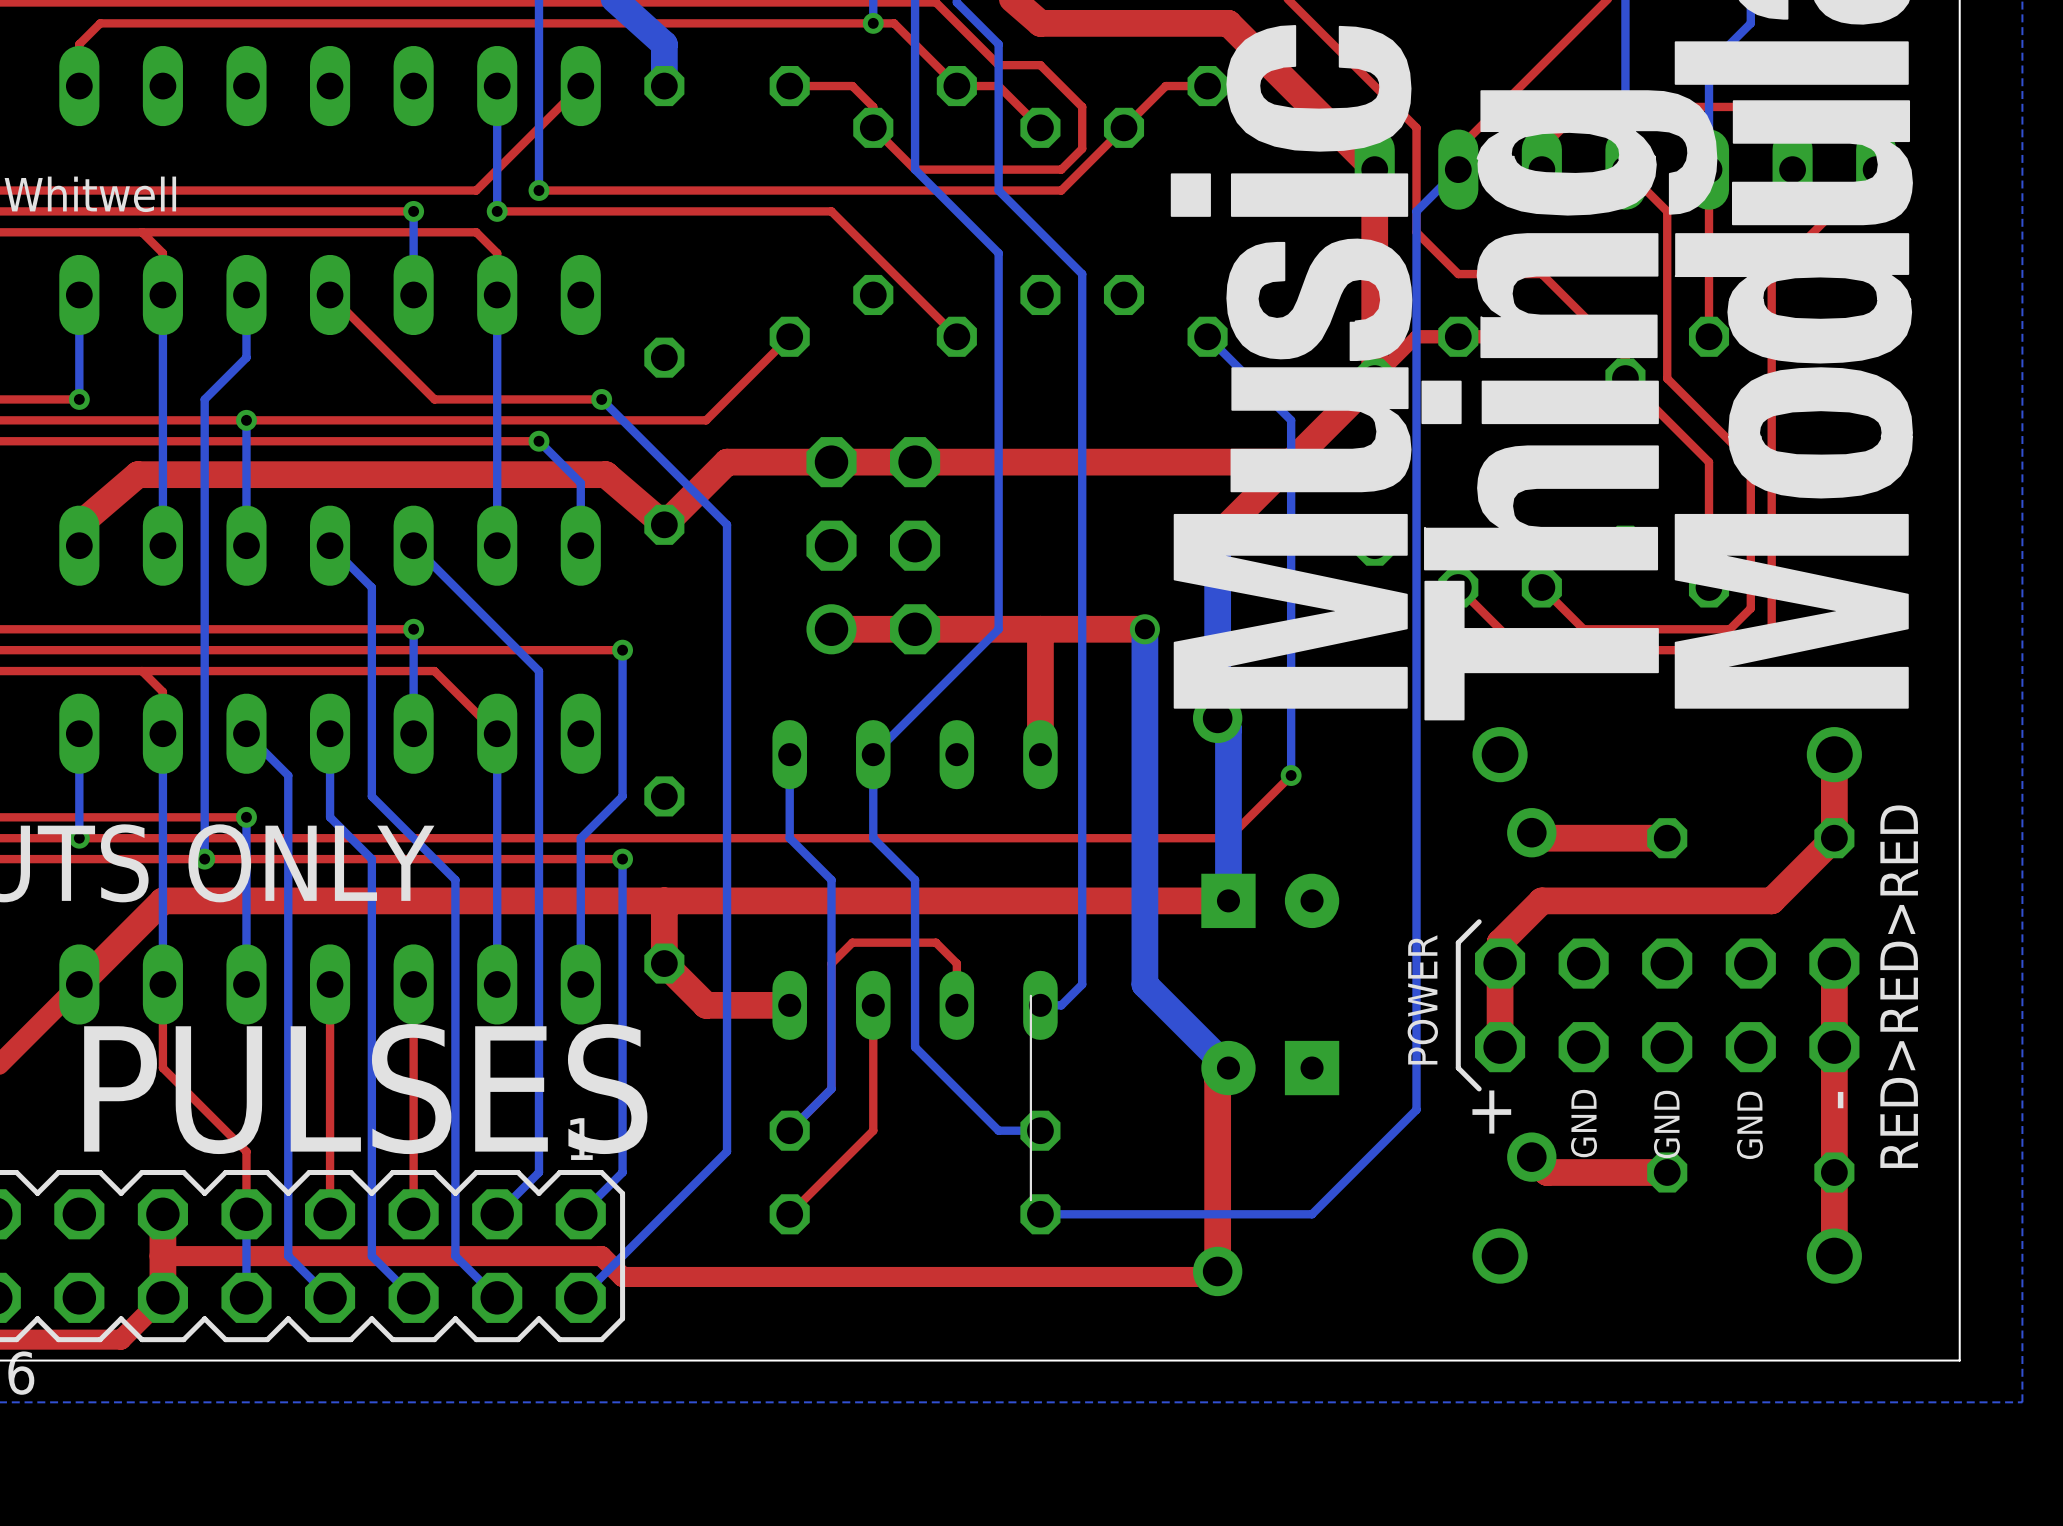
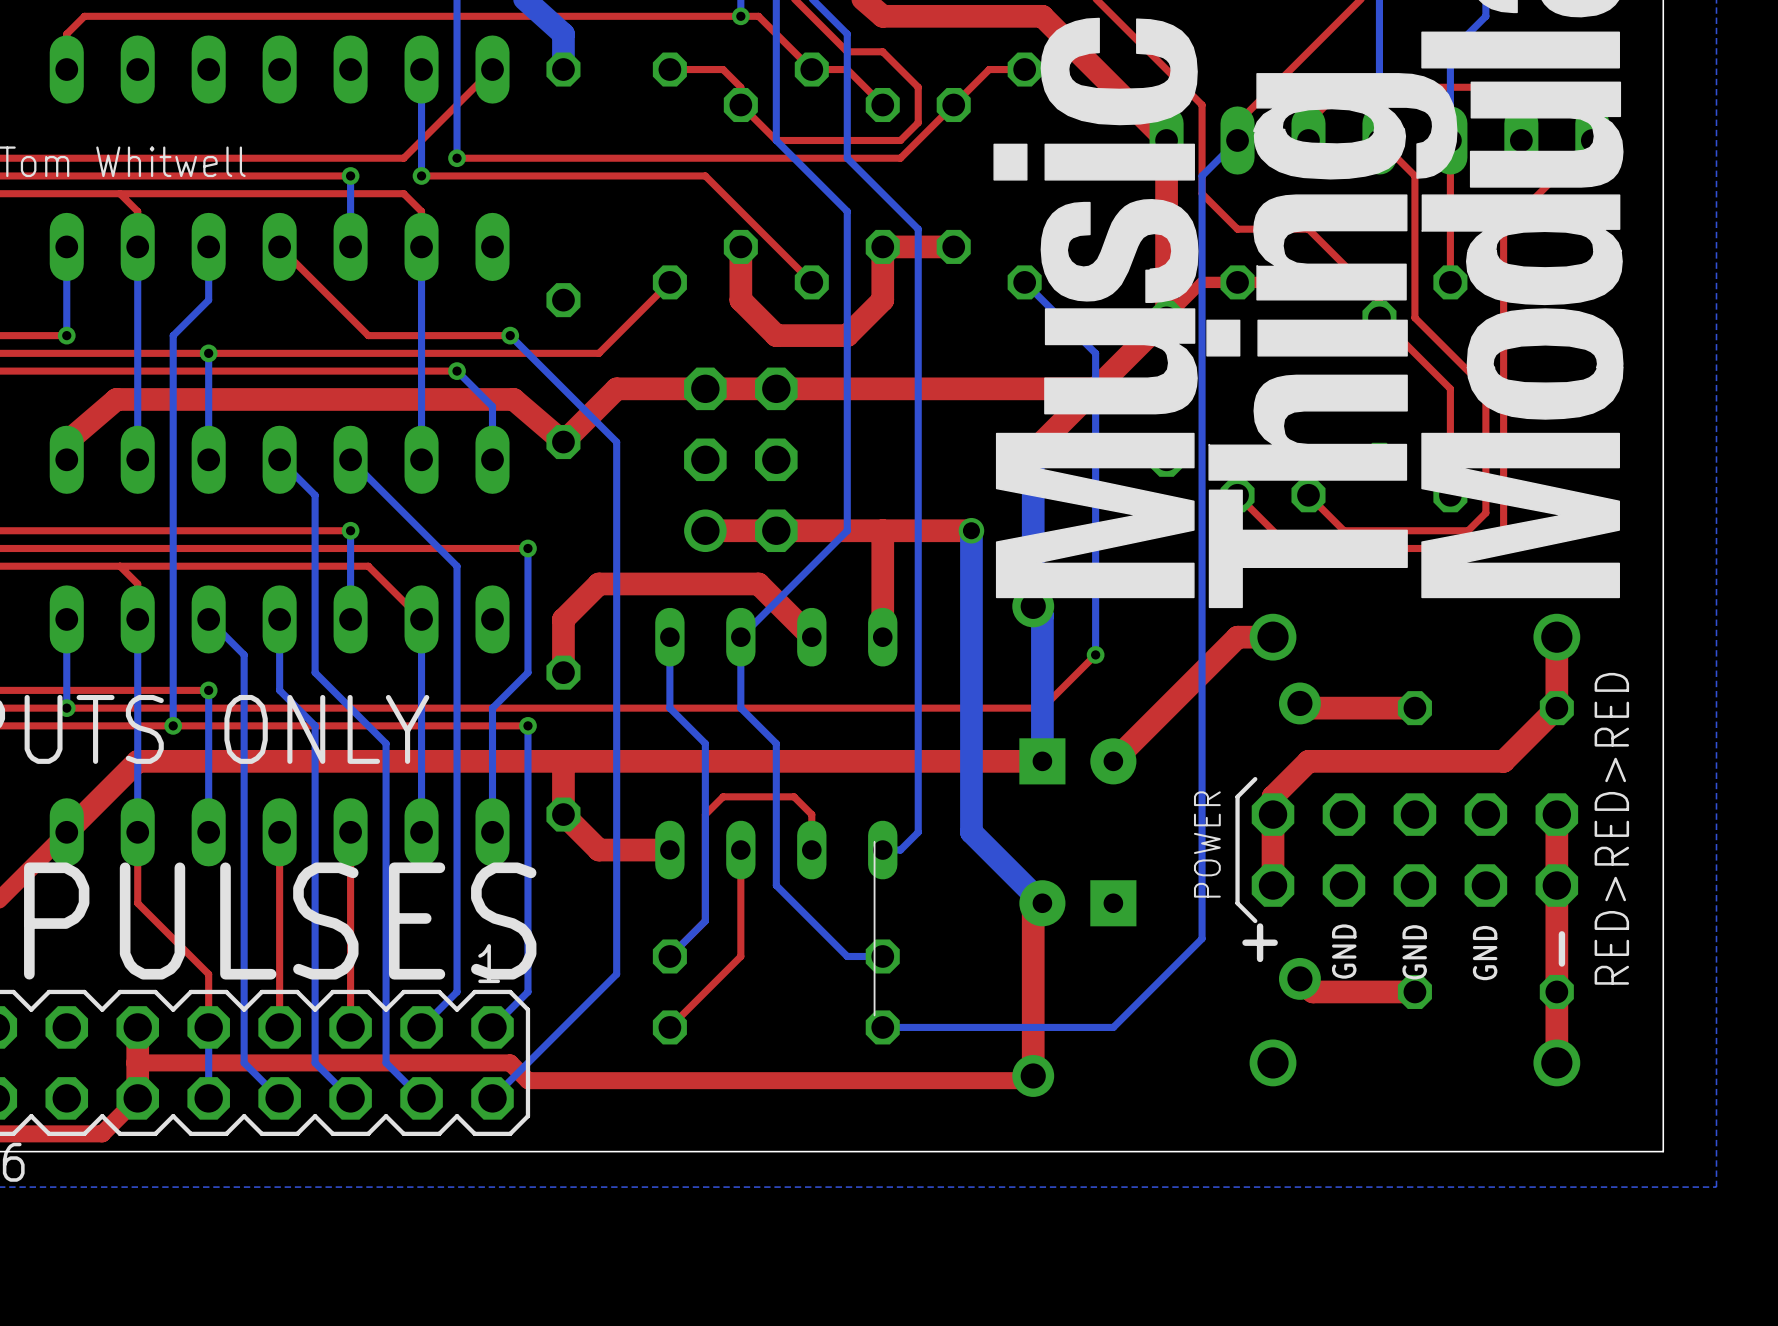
top track: none -> (953, 246) (882, 246) (882, 300) (847, 335) (776, 335) (740, 300) (740, 246)
top track: none -> (811, 637) (758, 583) (598, 583) (563, 619) (563, 672)
top track: none -> (1273, 637) (1237, 637) (1113, 761)

